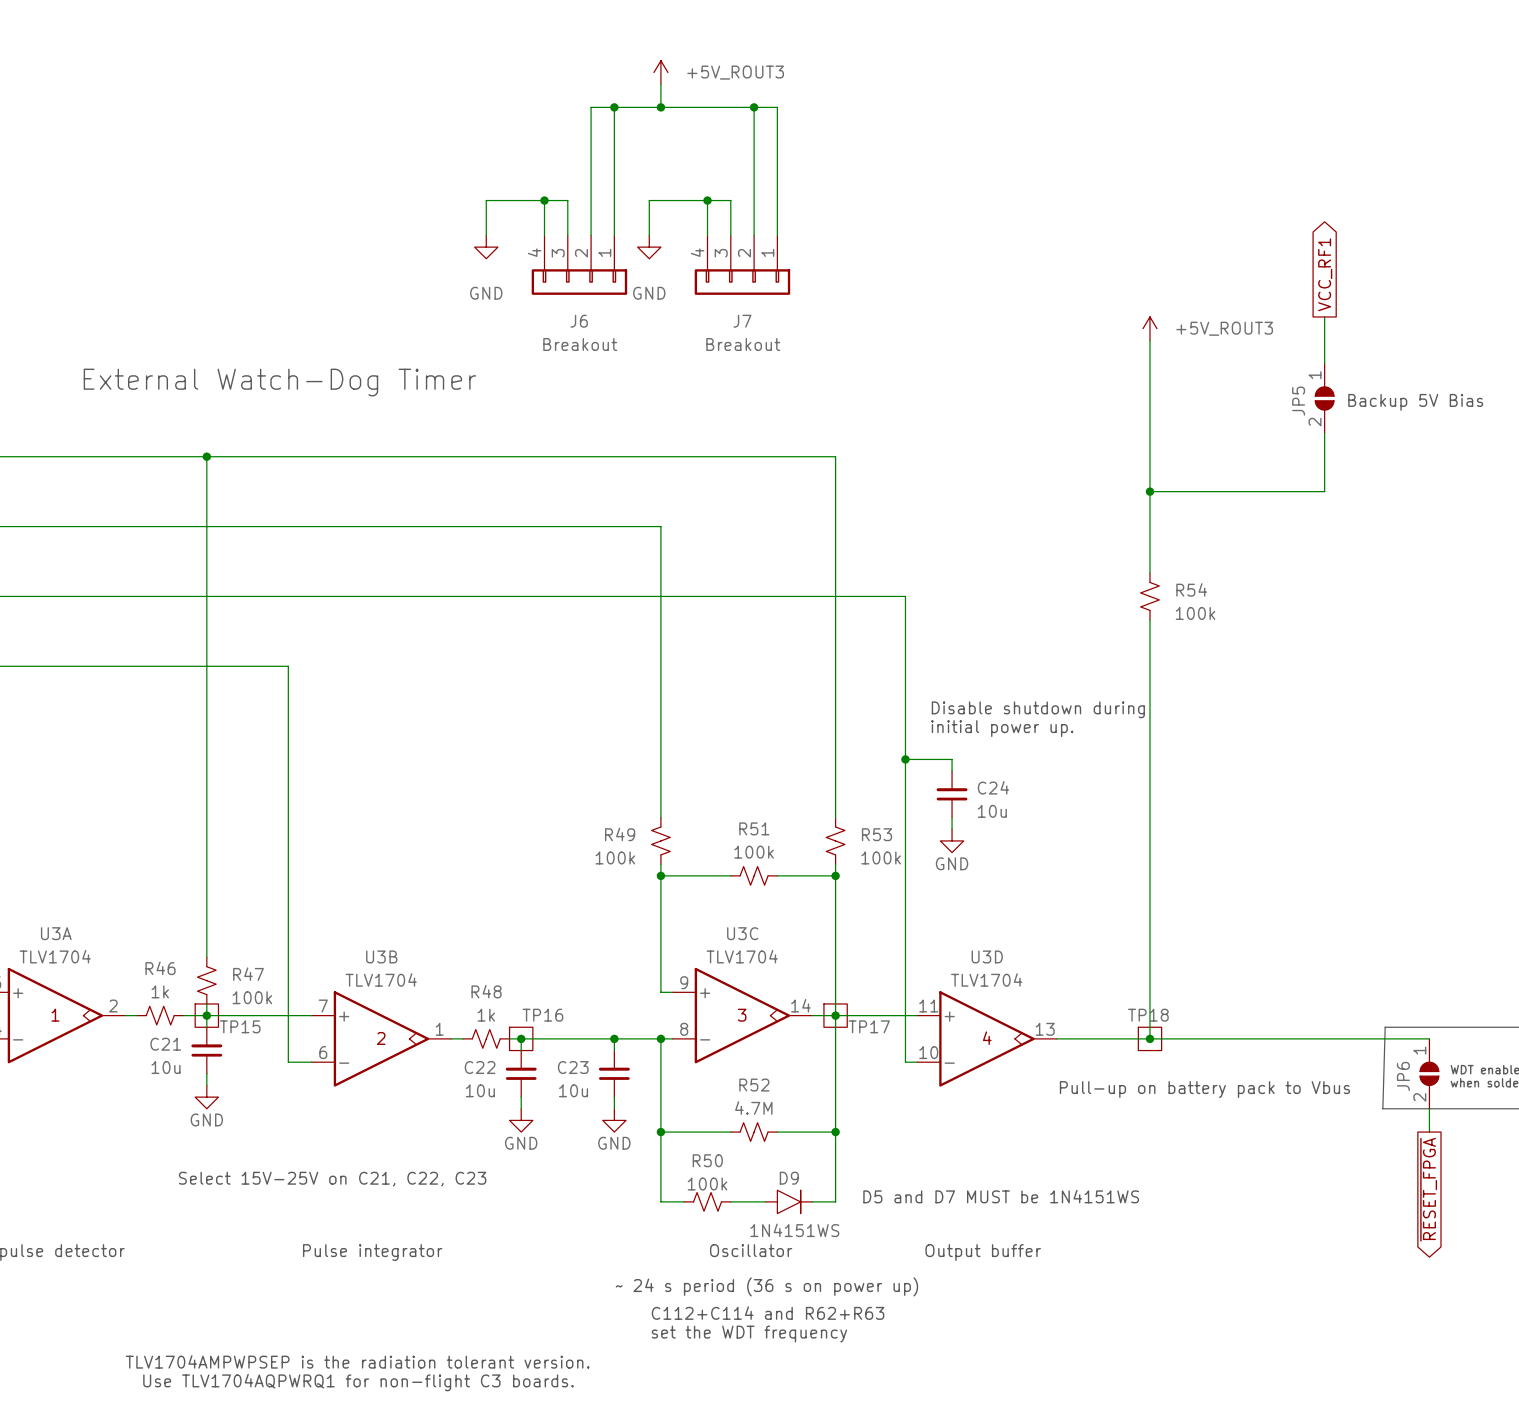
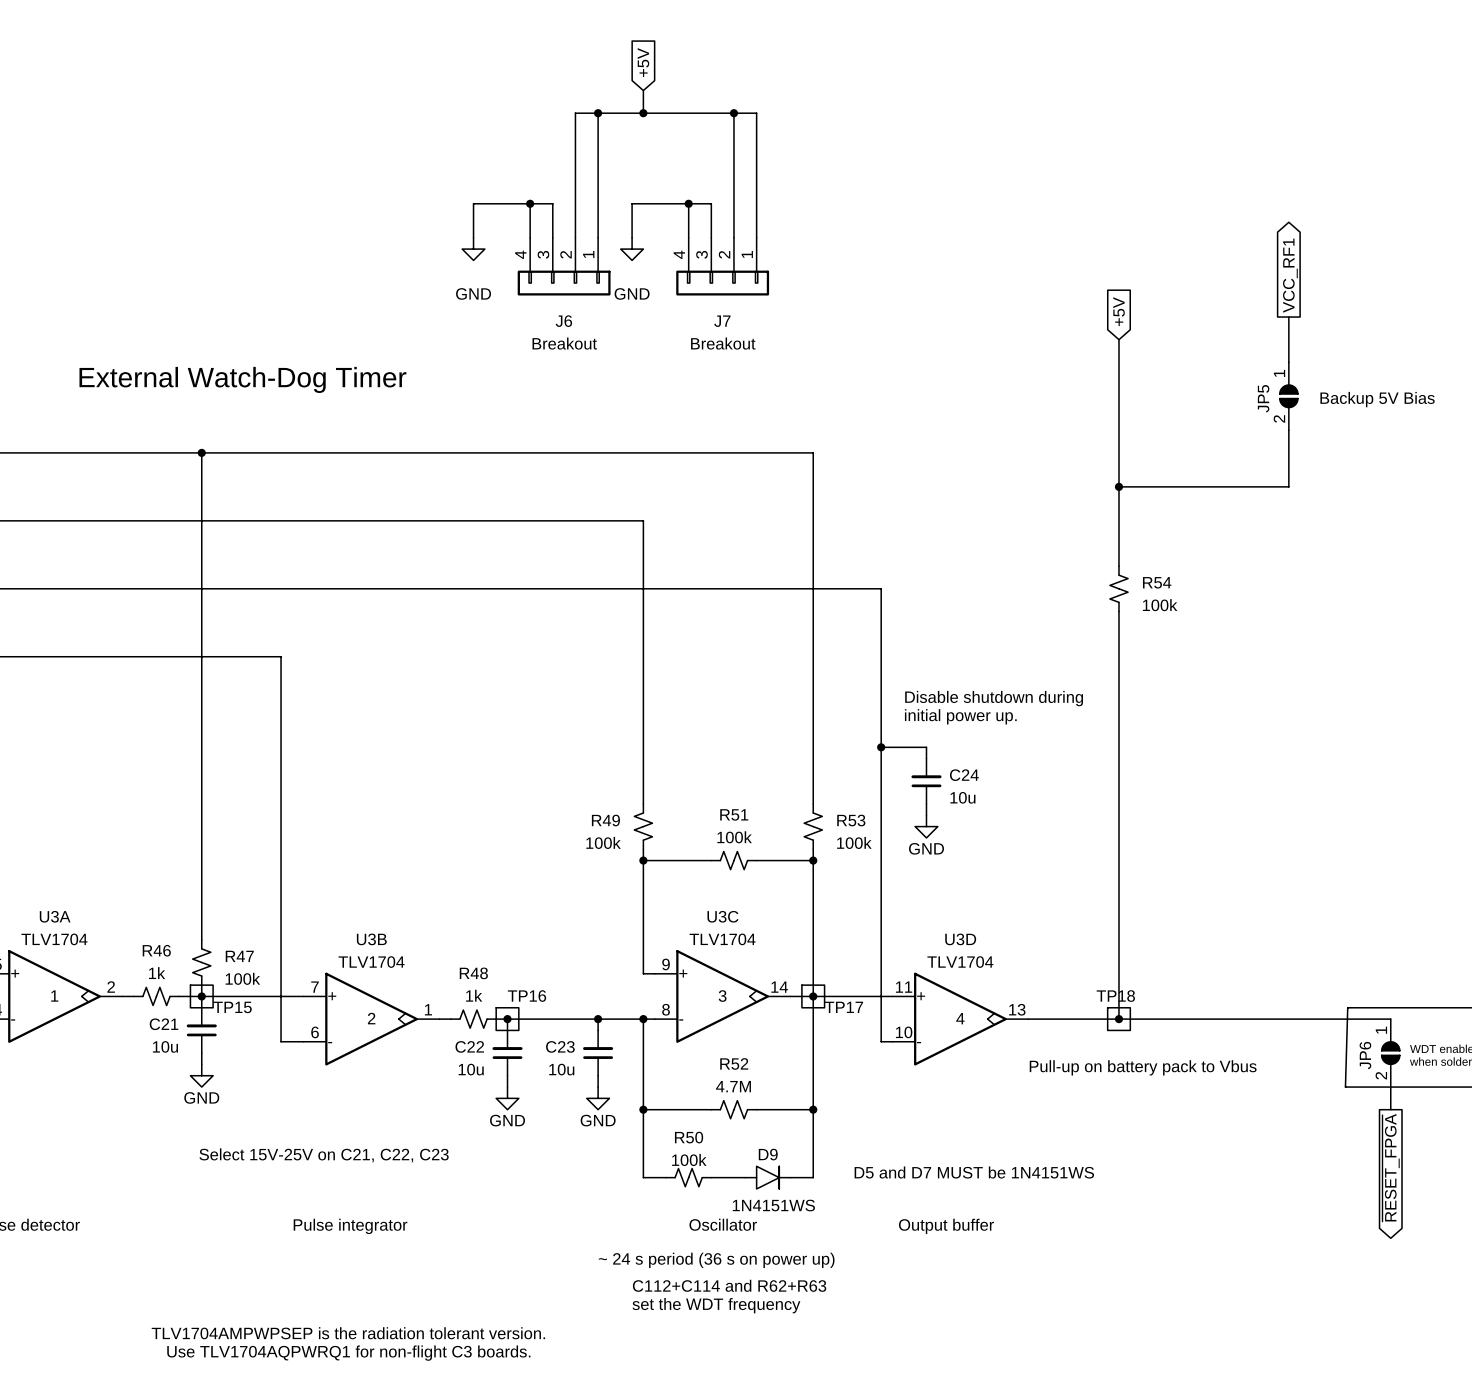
global label: none -> +5V (643, 62)
power symbol: +5V_ROUT3 (660, 72) -> none
global label: none -> +5V (1119, 311)
power symbol: +5V_ROUT3 (1149, 328) -> none

